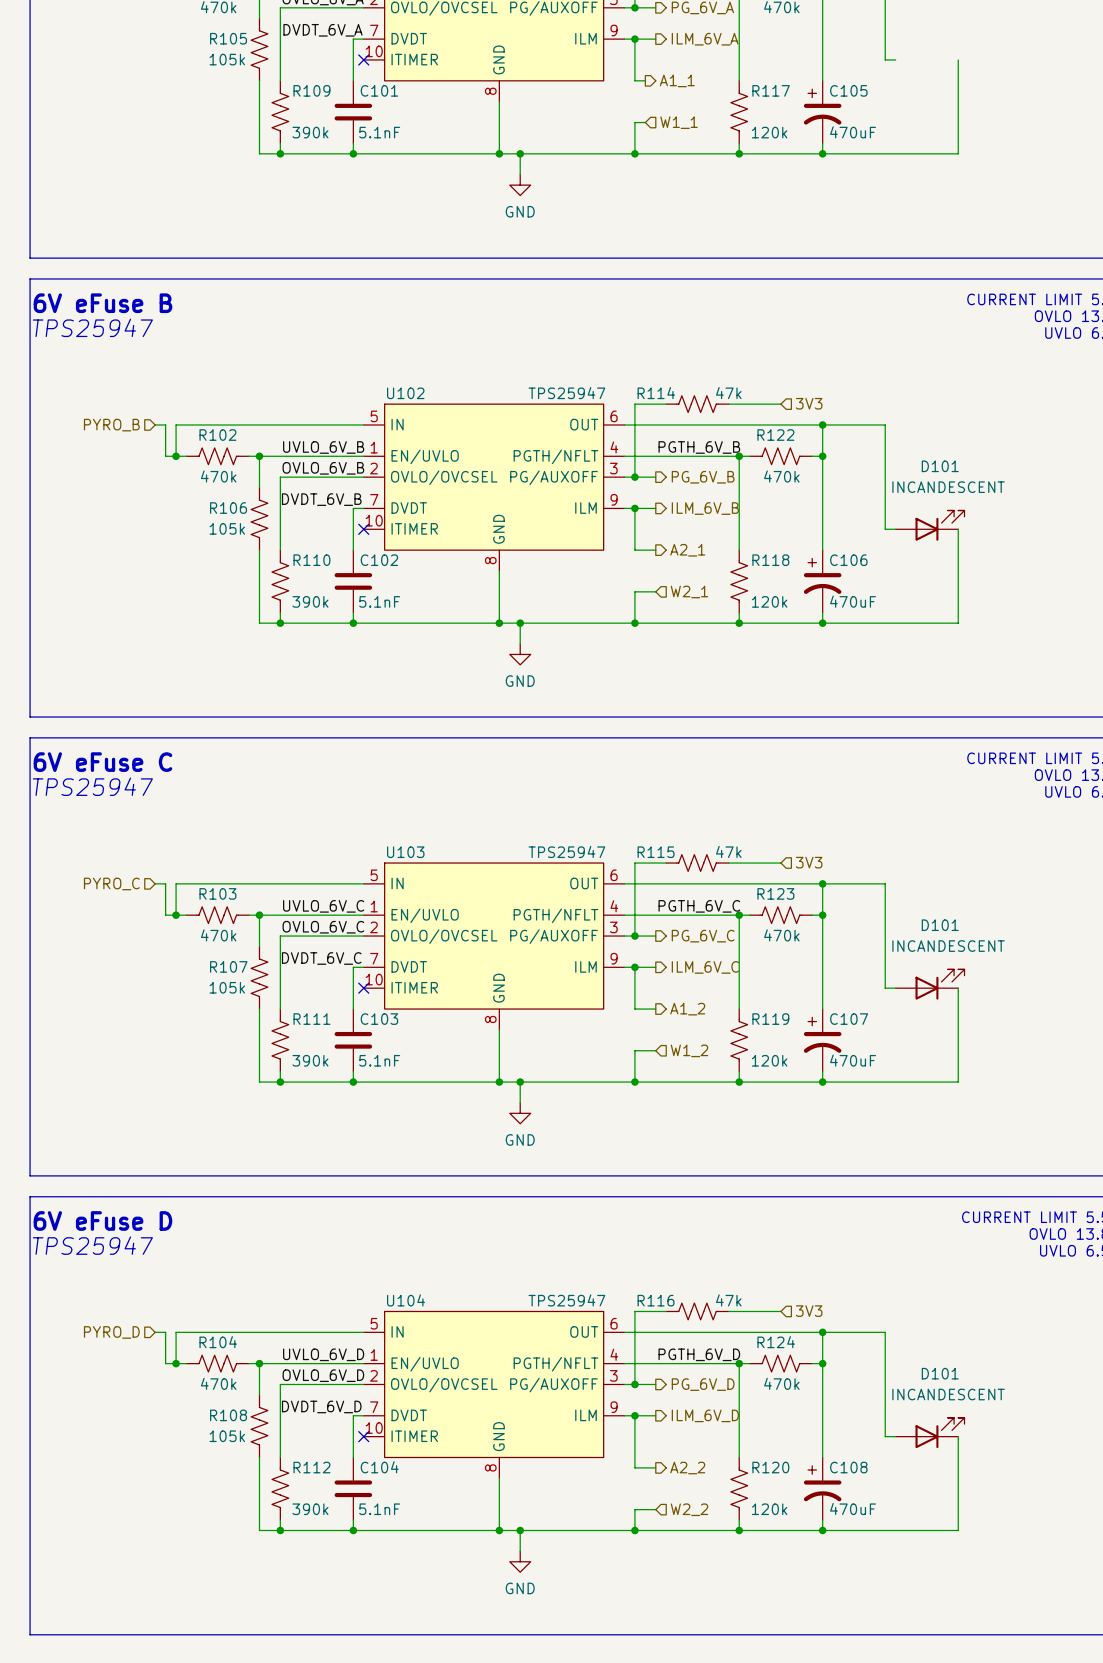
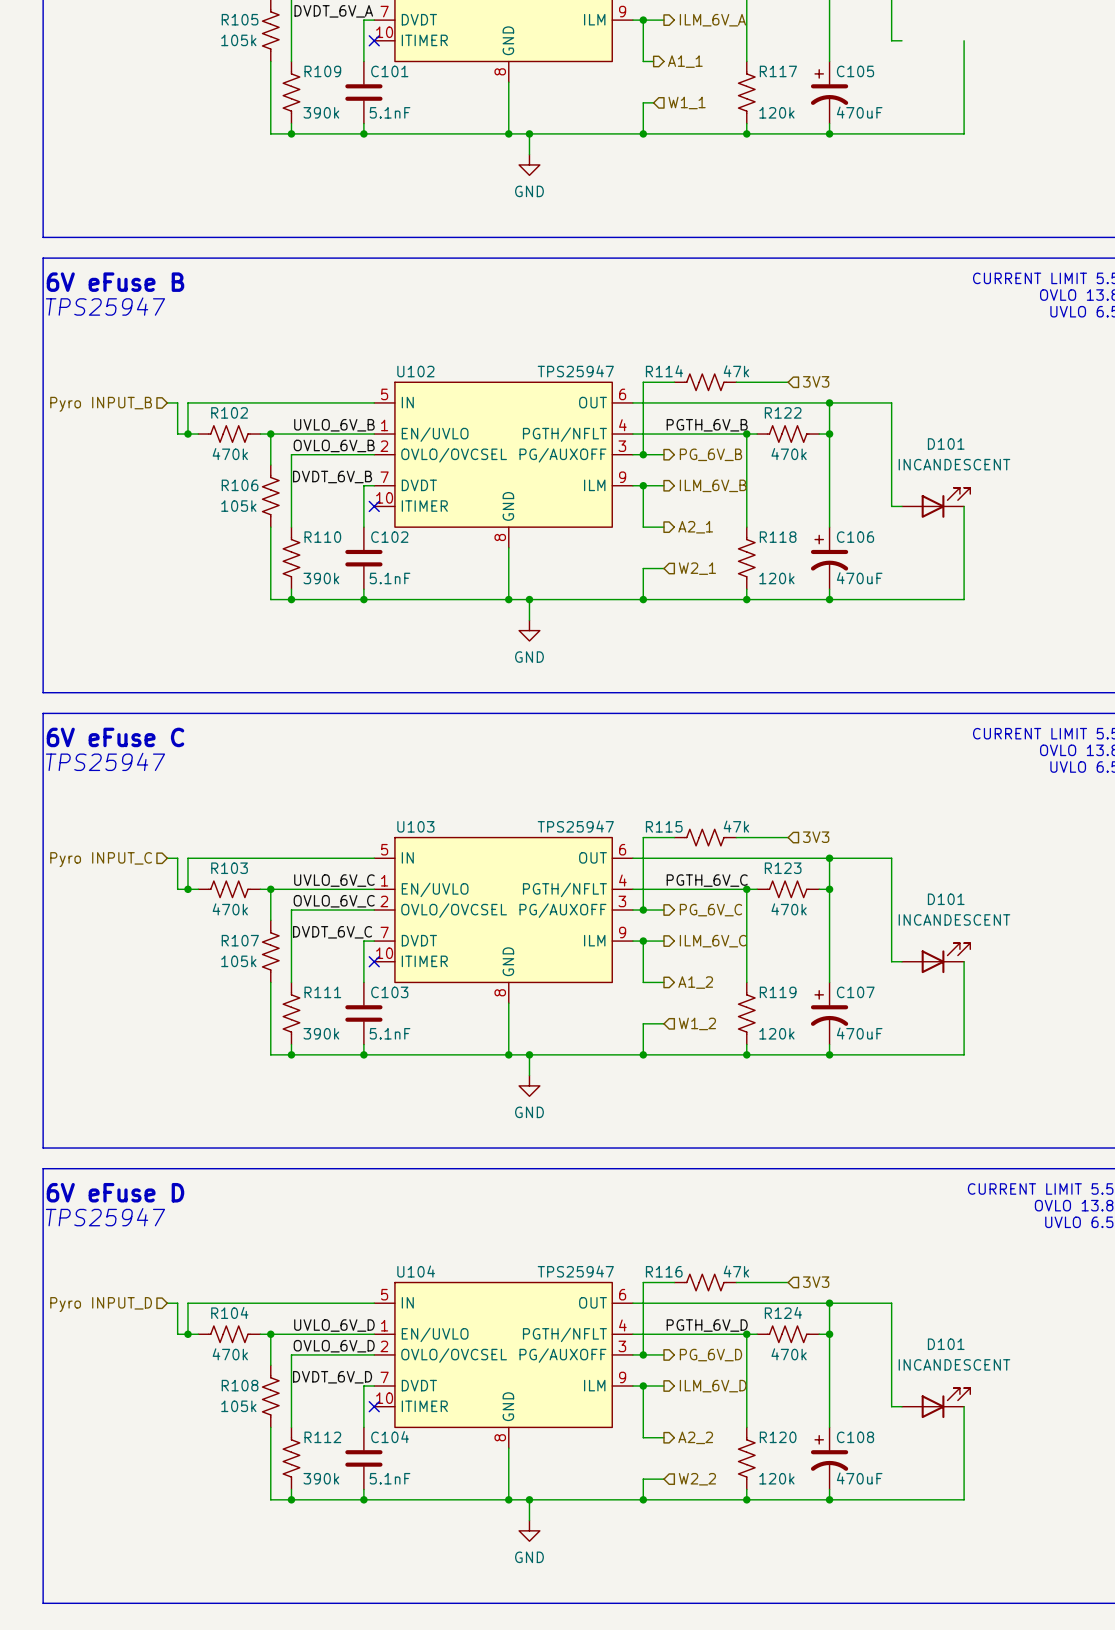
hierarchical label: PYRO_B (111, 425) -> Pyro INPUT_B (101, 404)
hierarchical label: PYRO_C (111, 883) -> Pyro INPUT_C (101, 859)
hierarchical label: PYRO_D (111, 1332) -> Pyro INPUT_D (101, 1304)

